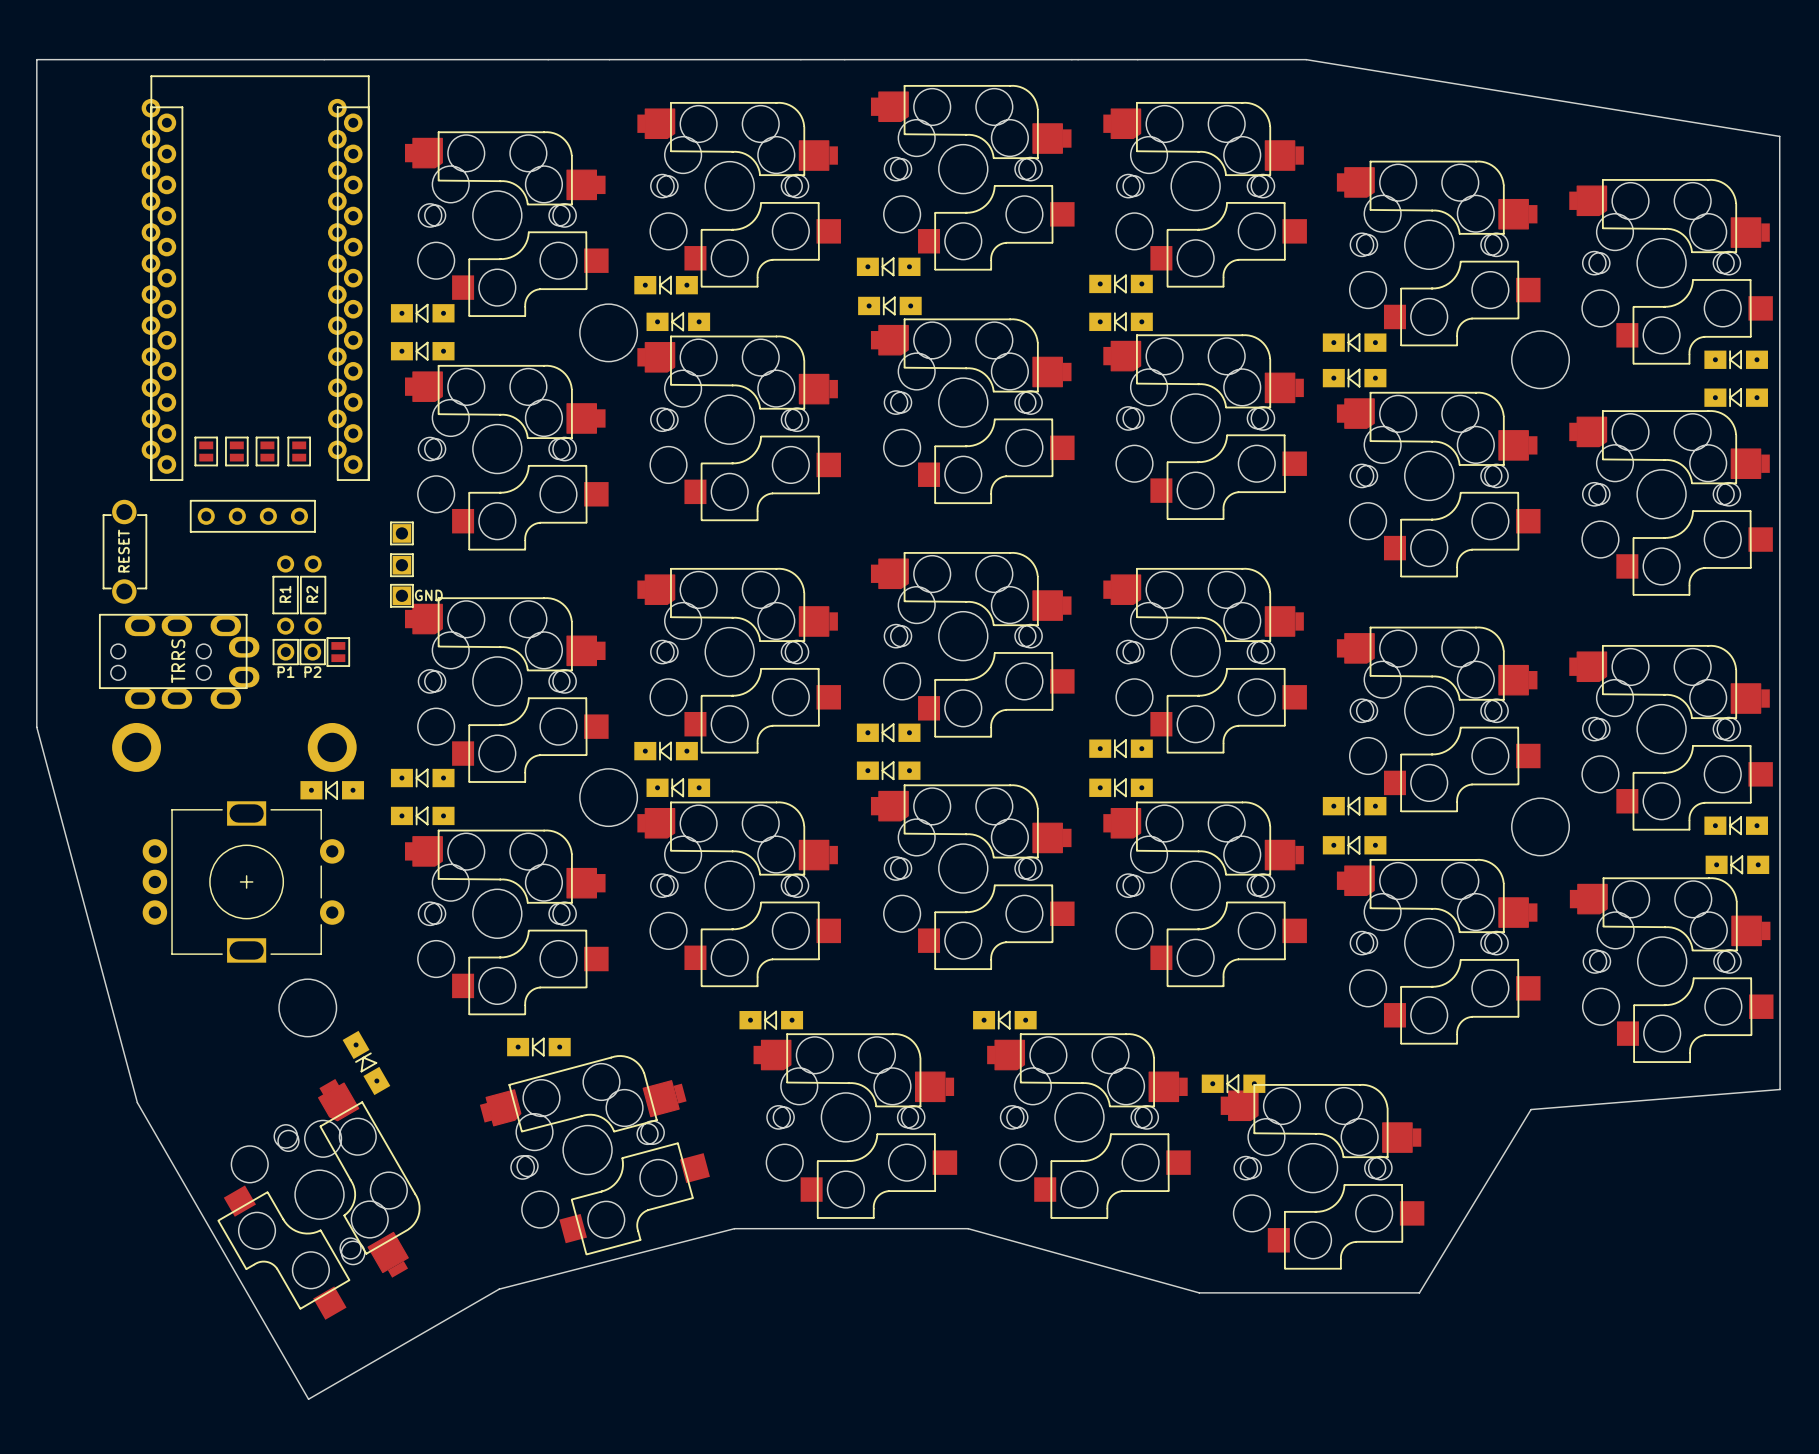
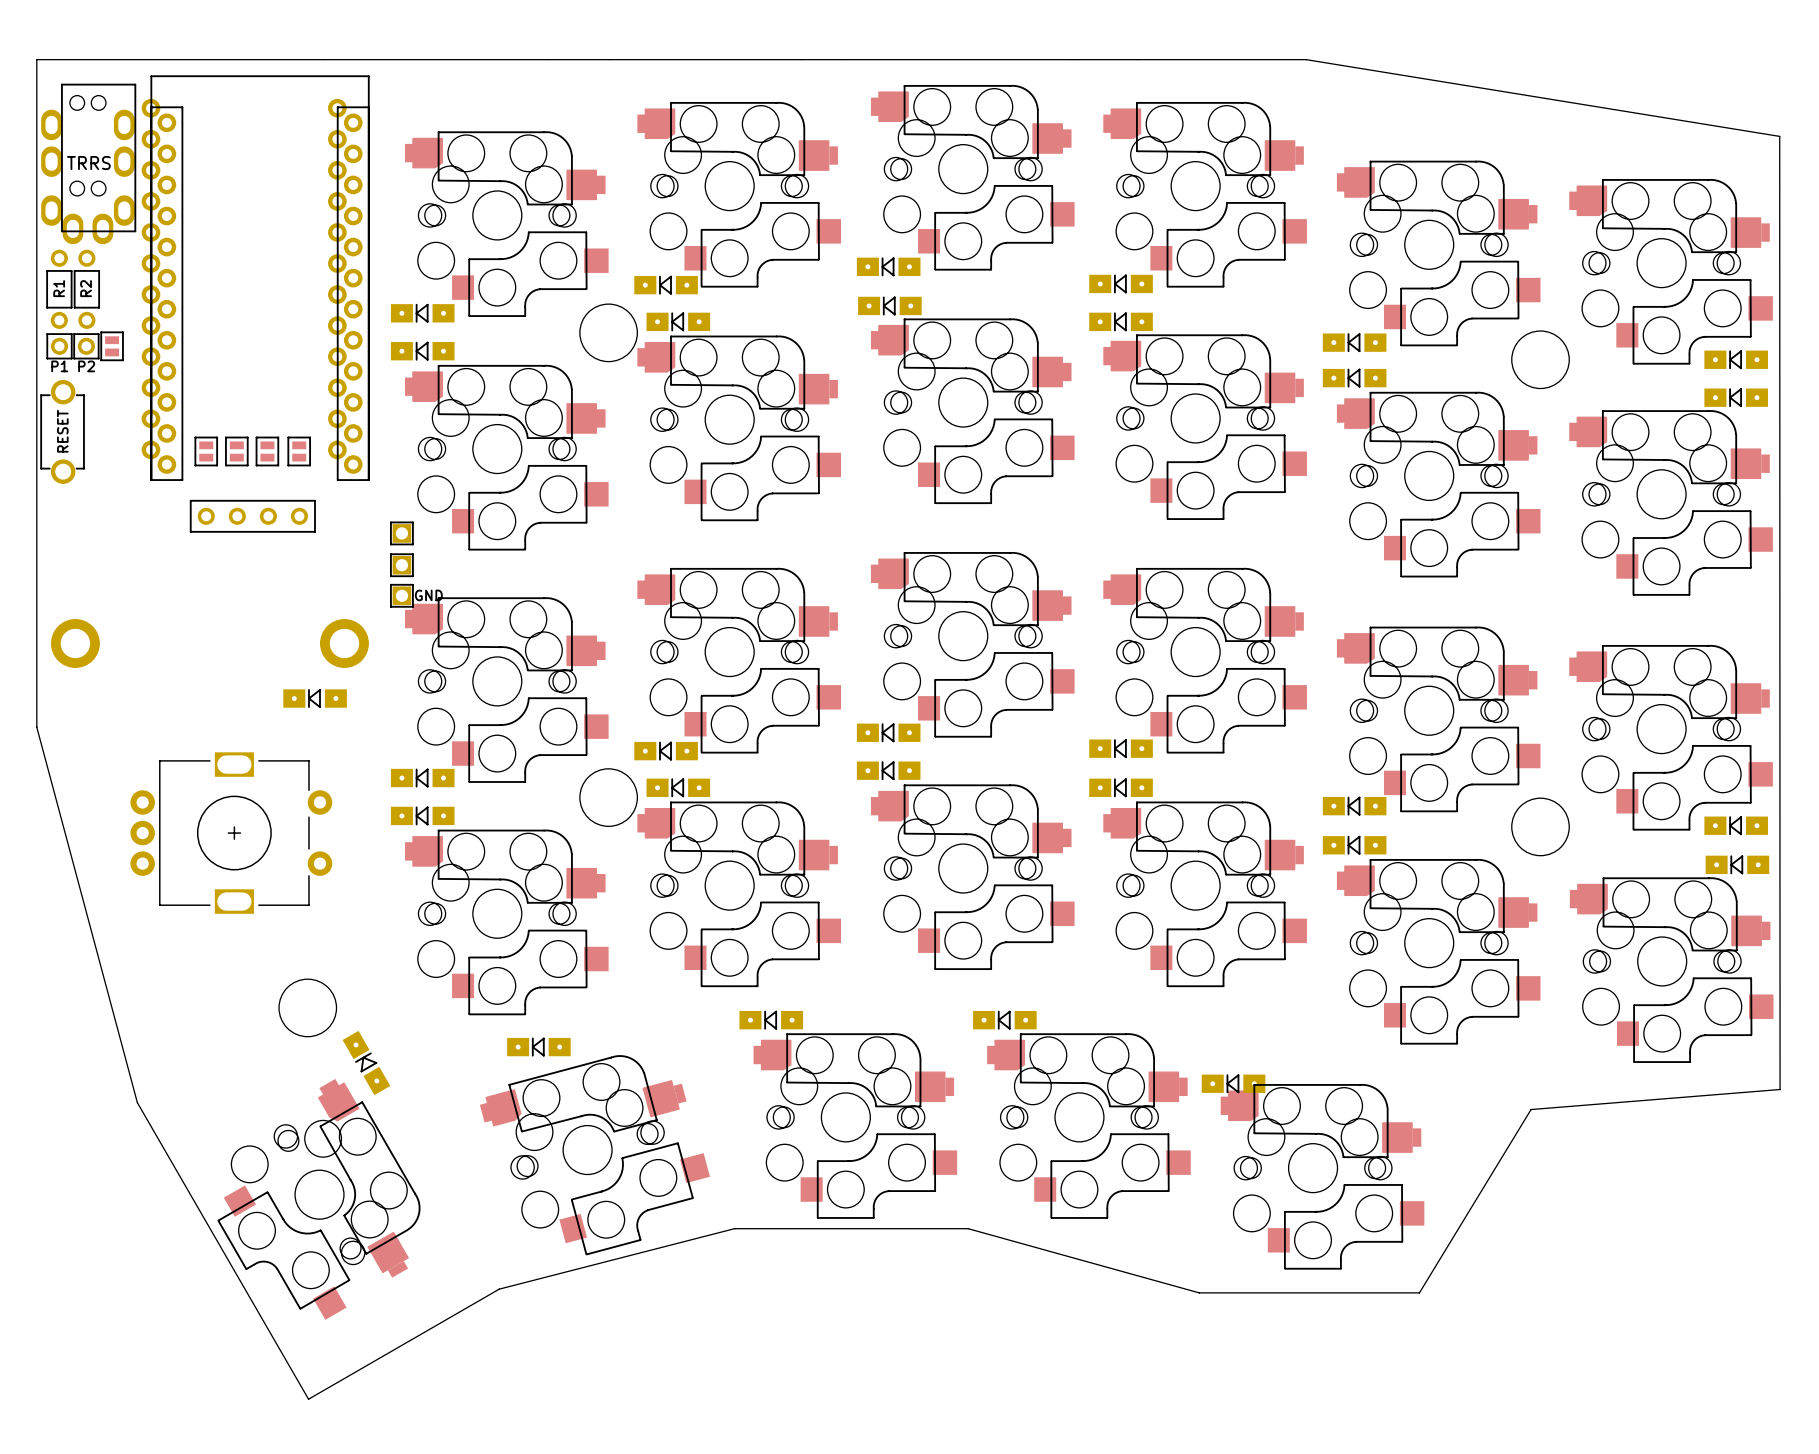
part: none -> (88, 163)
part: none -> (112, 346)
part rotation: 0° (124, 551) -> 180° (62, 431)
part position: (124, 551) -> (62, 431)
R1 position: (285, 595) -> (59, 289)
R2 position: (313, 595) -> (86, 289)
part footprint: [326, 637, 351, 667] -> [320, 619, 369, 668]
P1 position: (285, 652) -> (59, 346)
P2 position: (312, 652) -> (86, 346)
part: (179, 661) -> none
part position: (136, 747) -> (75, 643)
part: (332, 747) -> none
part position: (332, 790) -> (315, 698)
part position: (243, 881) -> (231, 833)

